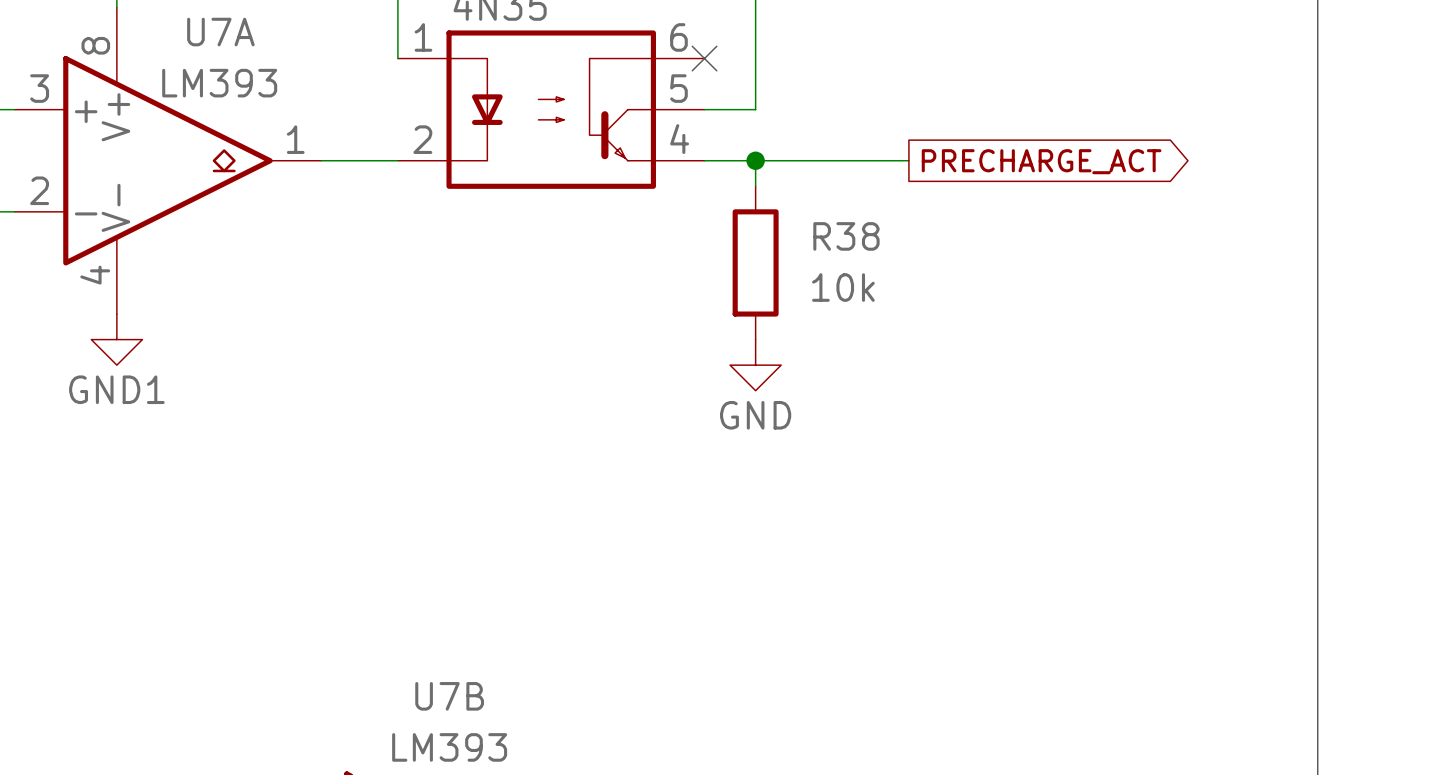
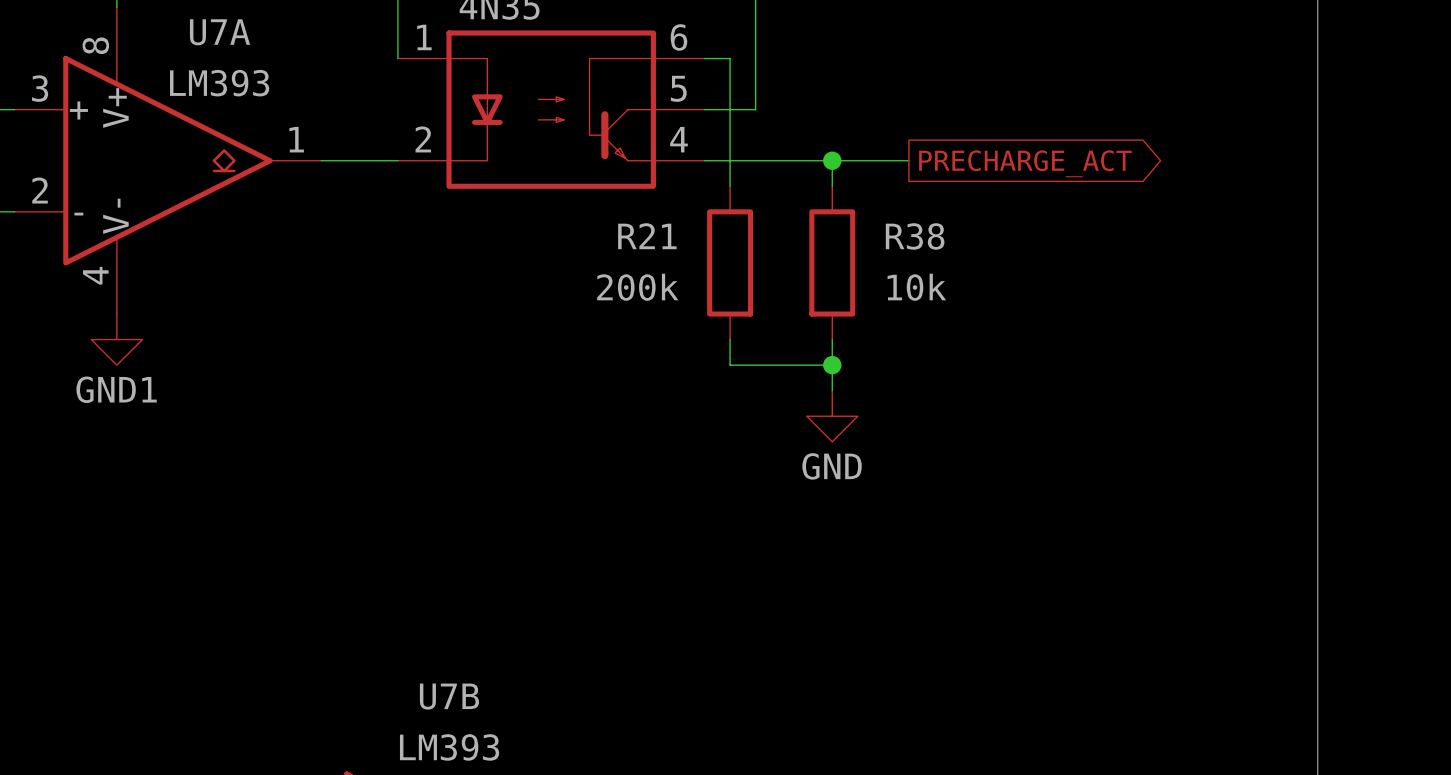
wire: none -> (704, 58) (730, 58) (730, 186)
no-connect mark: (704, 58) -> none
wire: (755, 160) (755, 186) -> (832, 160) (832, 186)
junction position: (755, 160) -> (832, 160)
R21: none -> 200k (730, 262)
R38 position: (755, 262) -> (832, 262)
wire: none -> (730, 339) (730, 365) (832, 365)
wire: none -> (832, 339) (832, 390)
power symbol position: GND (755, 365) -> GND (832, 416)
junction: none -> (832, 365)

